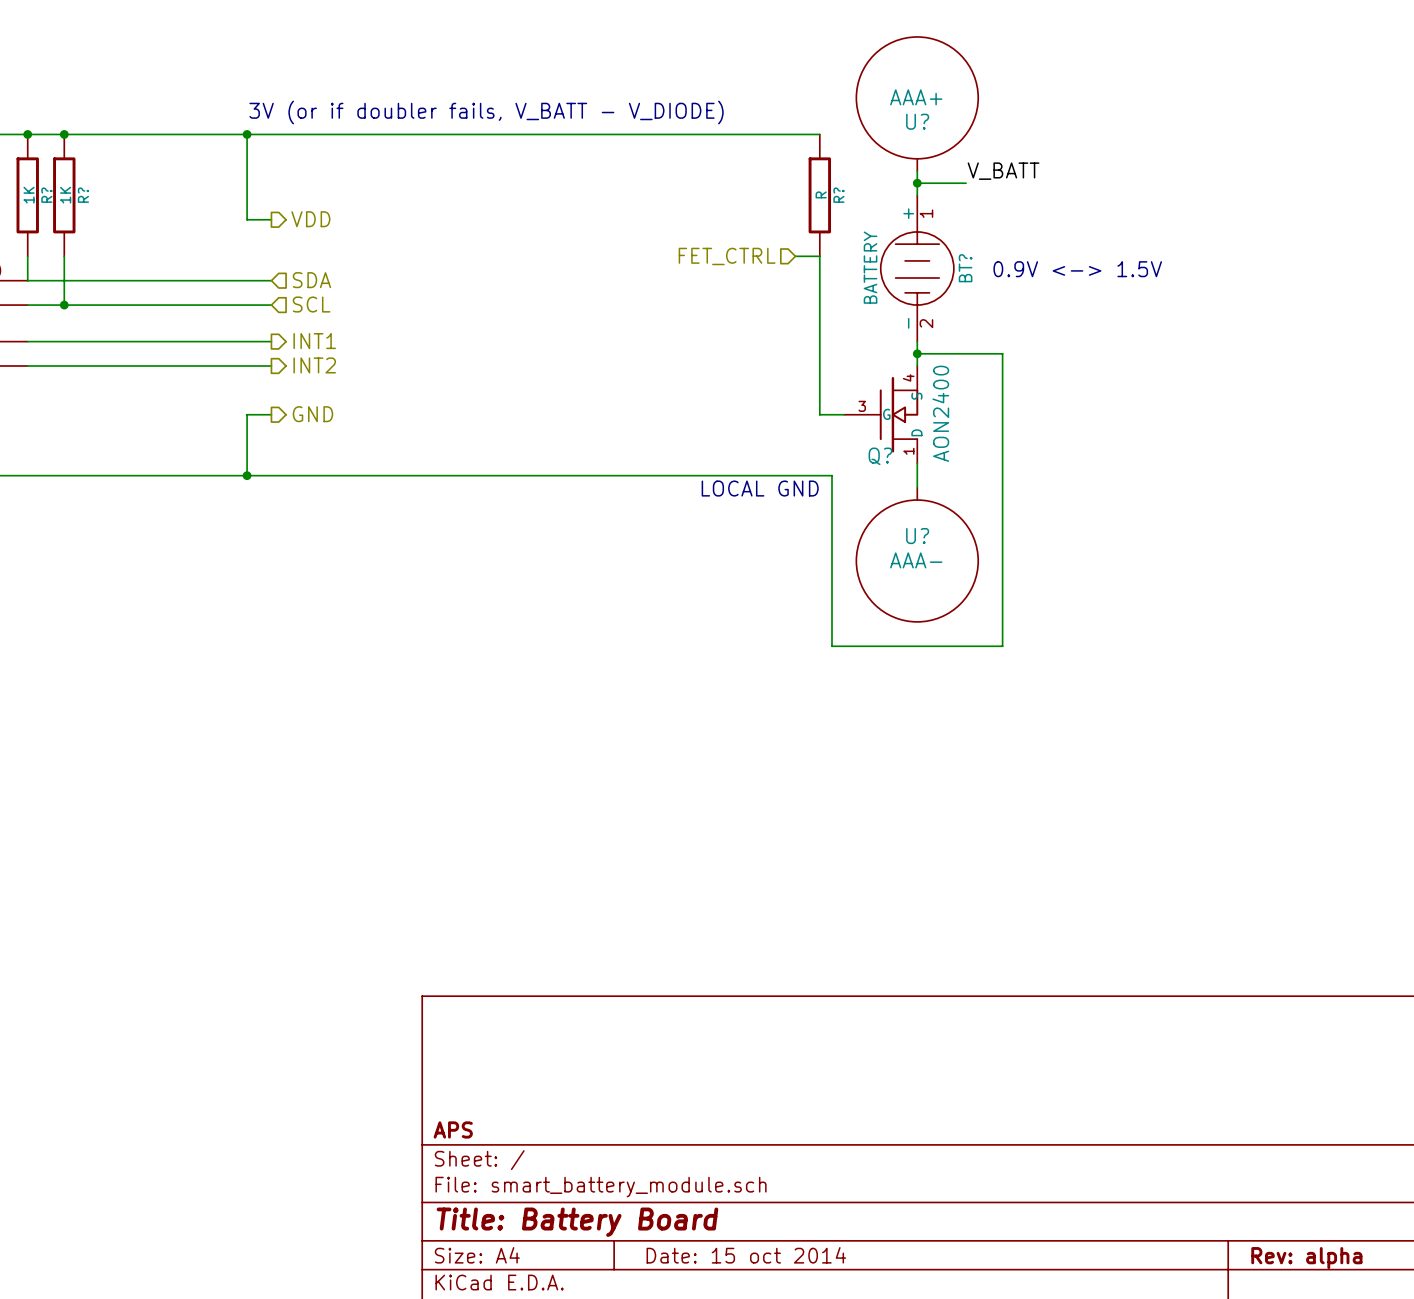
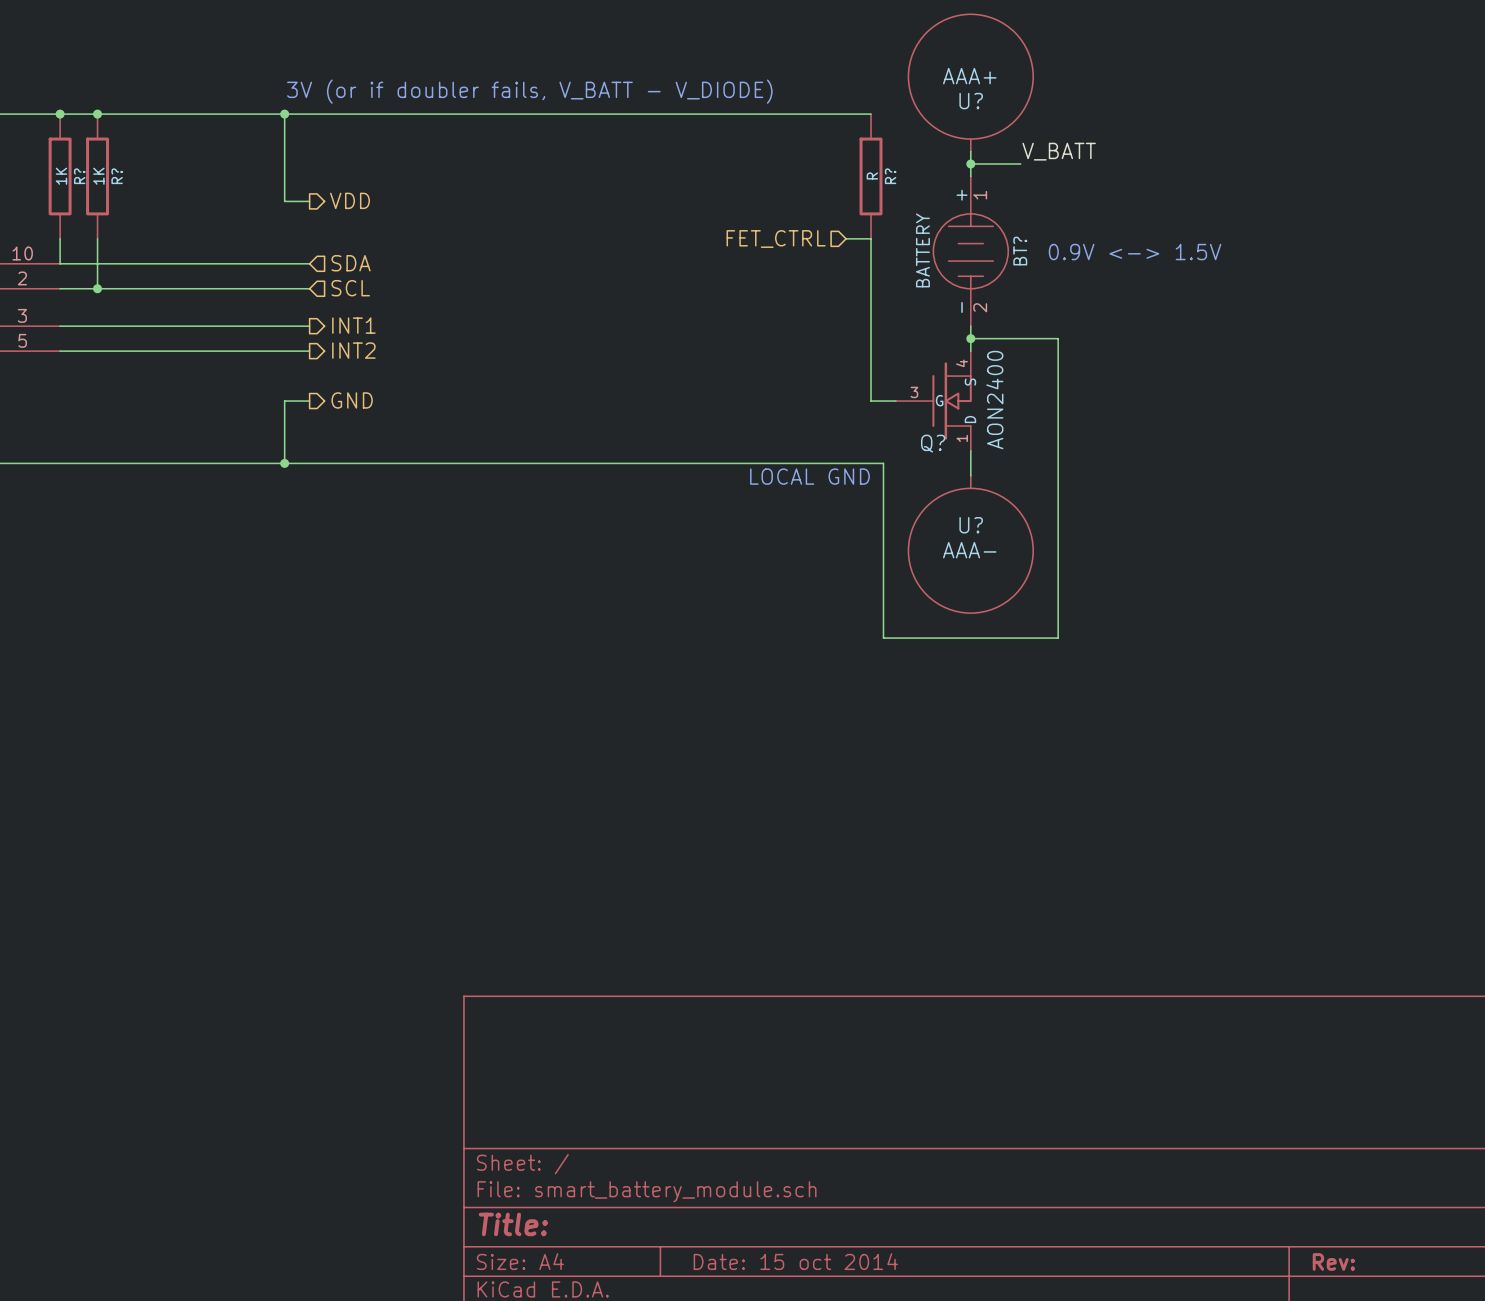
title block: APS (453, 1129) -> none
title block: Title: Battery Board (577, 1222) -> Title: (513, 1224)
title block: Rev: alpha (1306, 1258) -> Rev: (1333, 1261)

